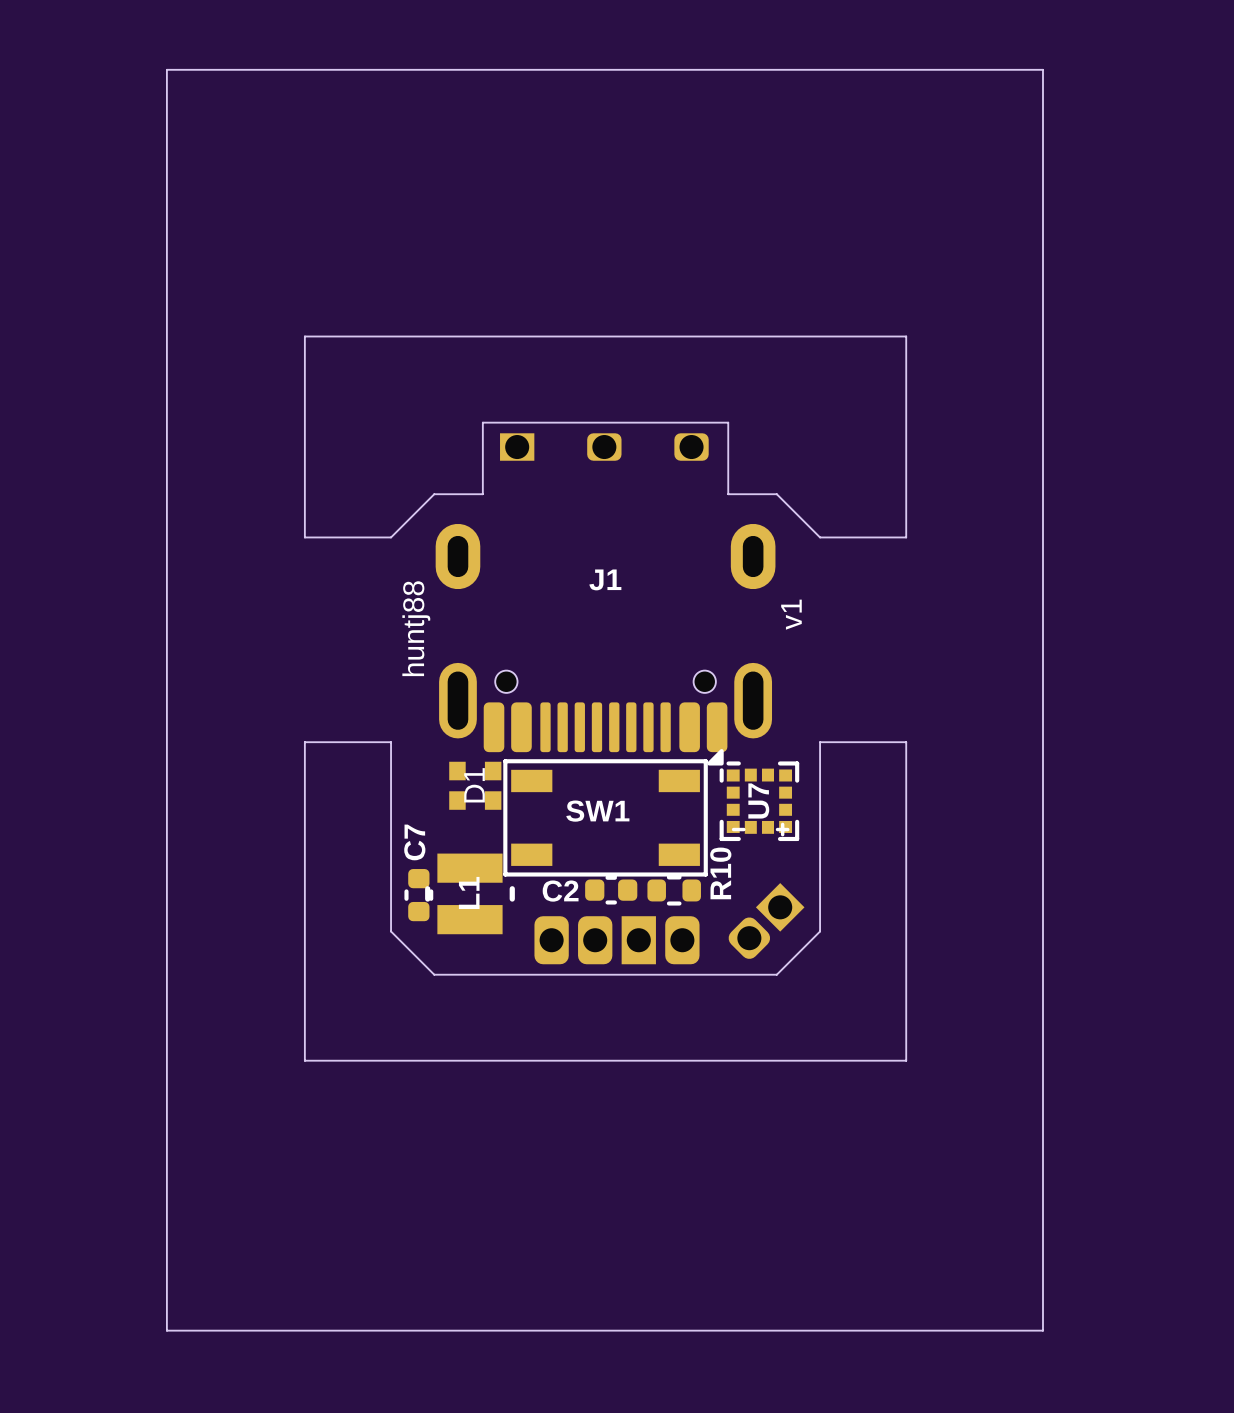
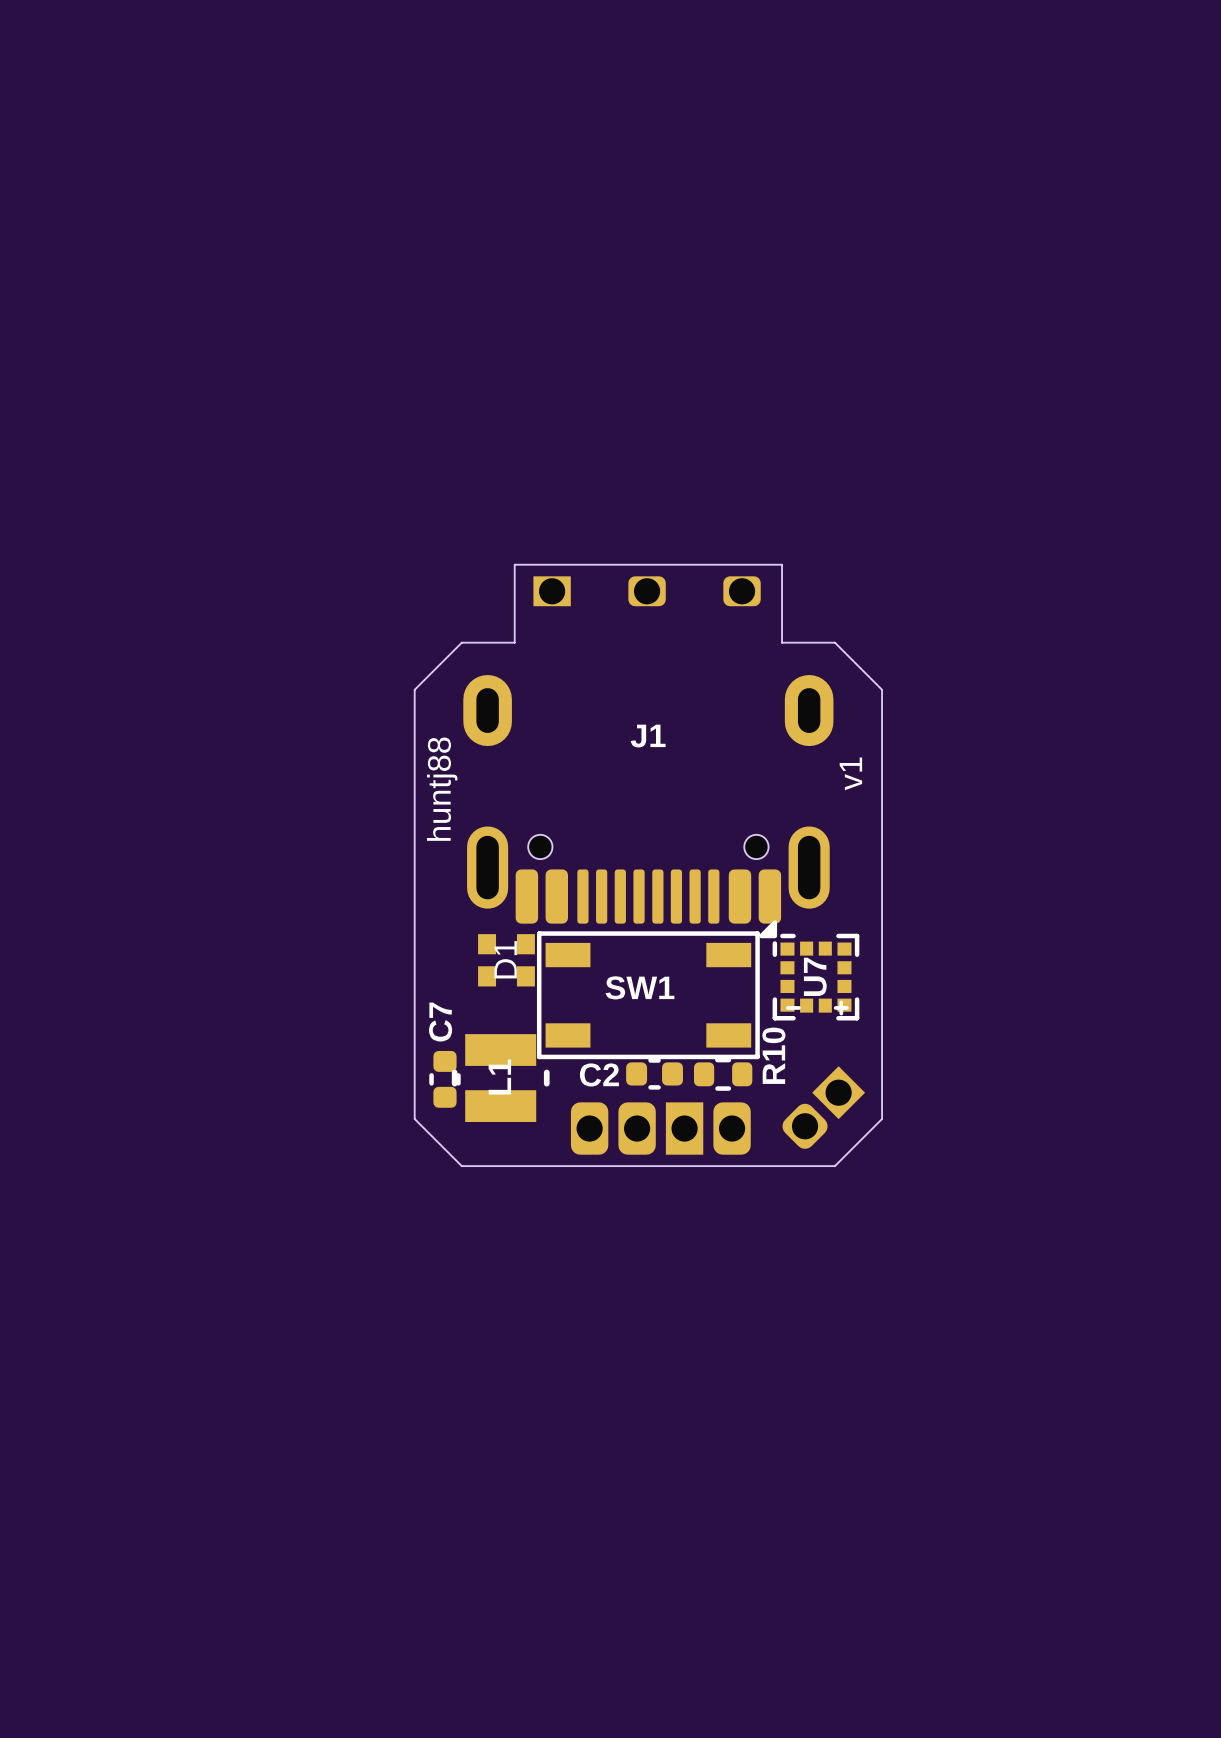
board edge: (166, 69) (1042, 69) (1042, 1330) (166, 1330) (166, 69) -> none
board edge: (391, 537) (304, 537) (304, 336) (906, 336) (906, 537) (820, 537) -> (882, 912) (882, 689)
board edge: (391, 742) (304, 742) (304, 1060) (906, 1060) (906, 742) (820, 742) -> (414, 912) (414, 689)

